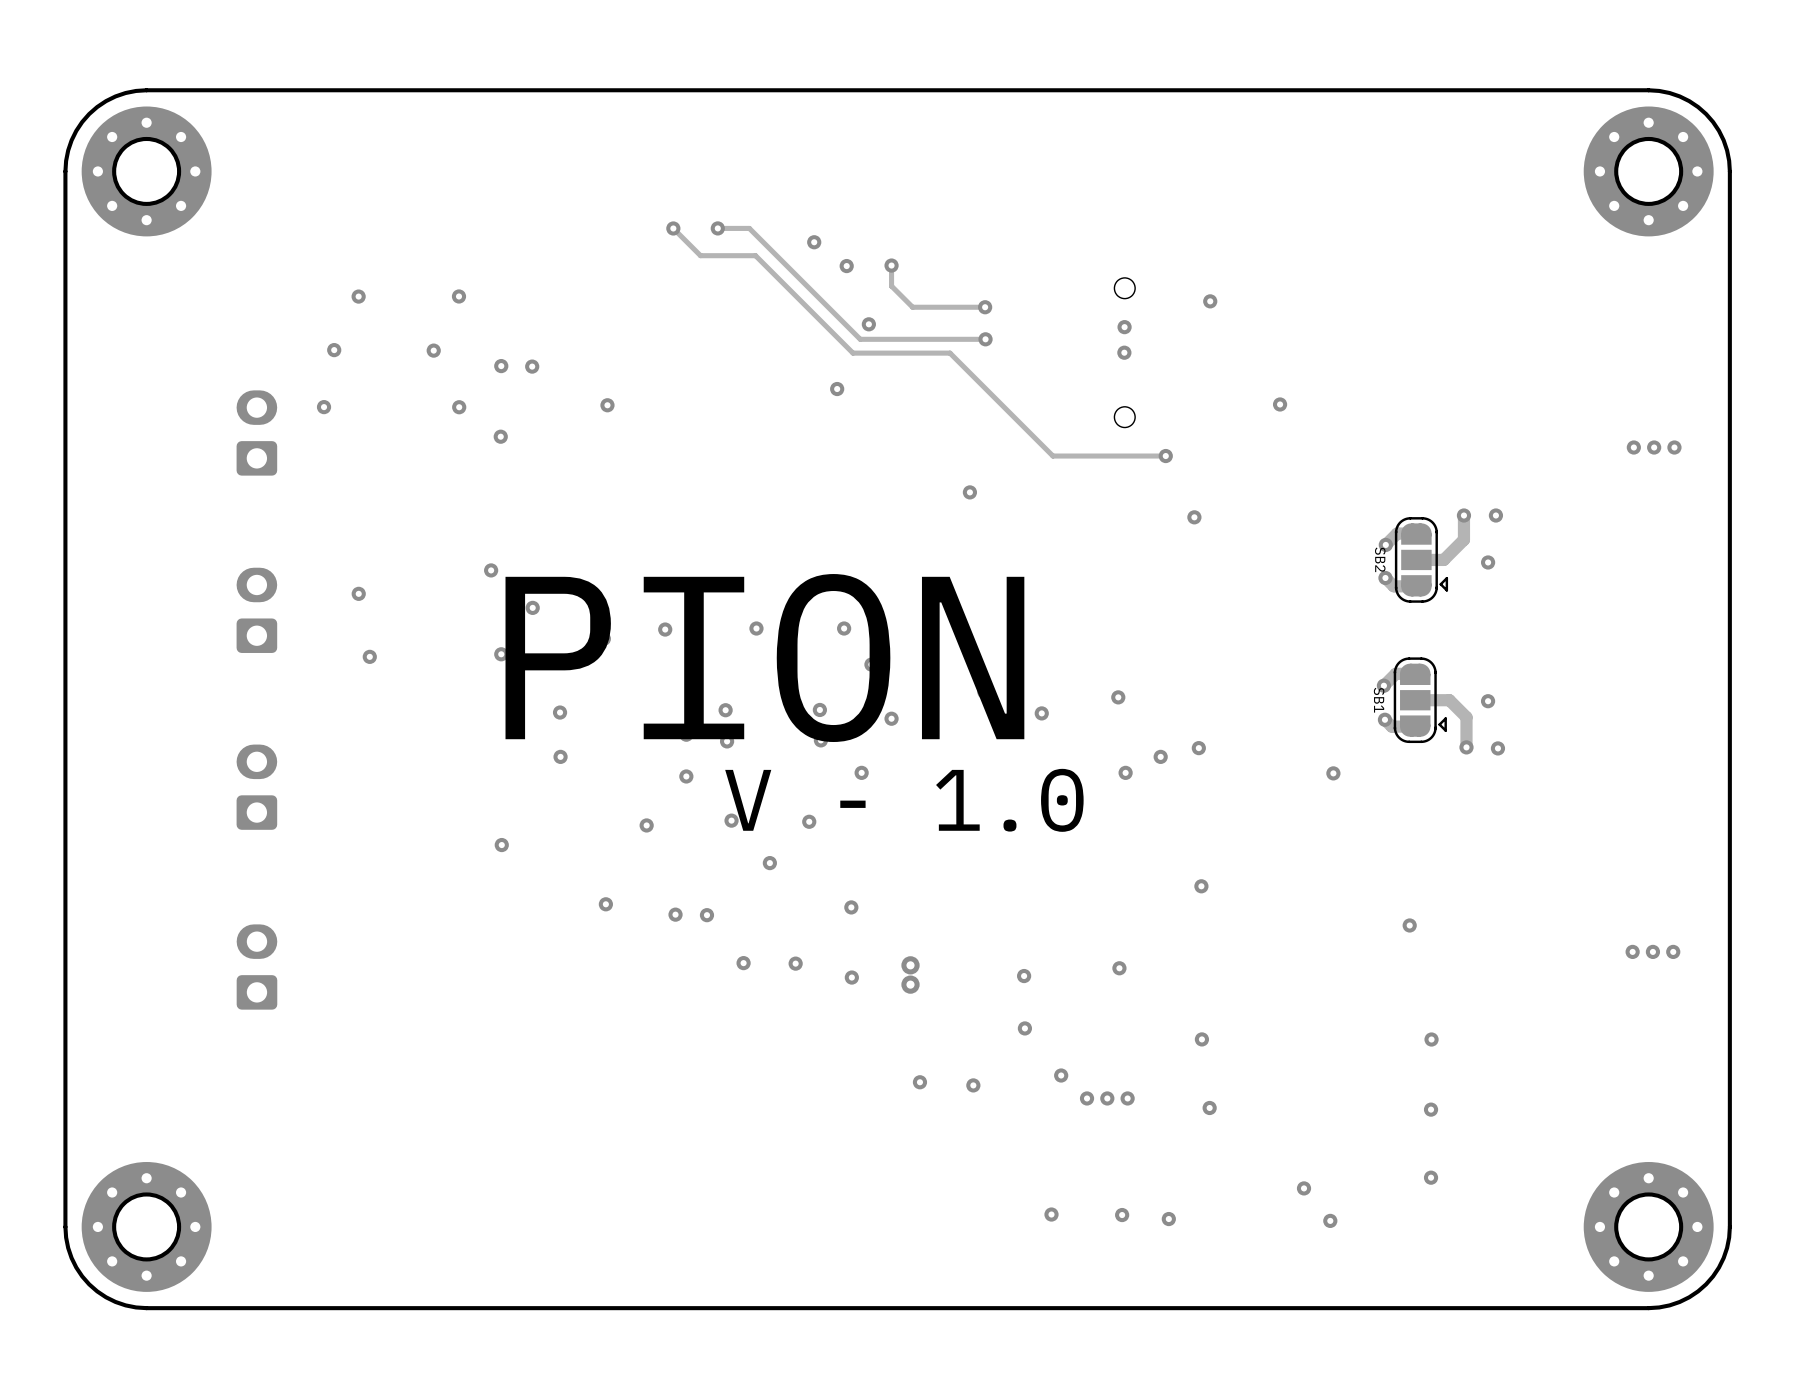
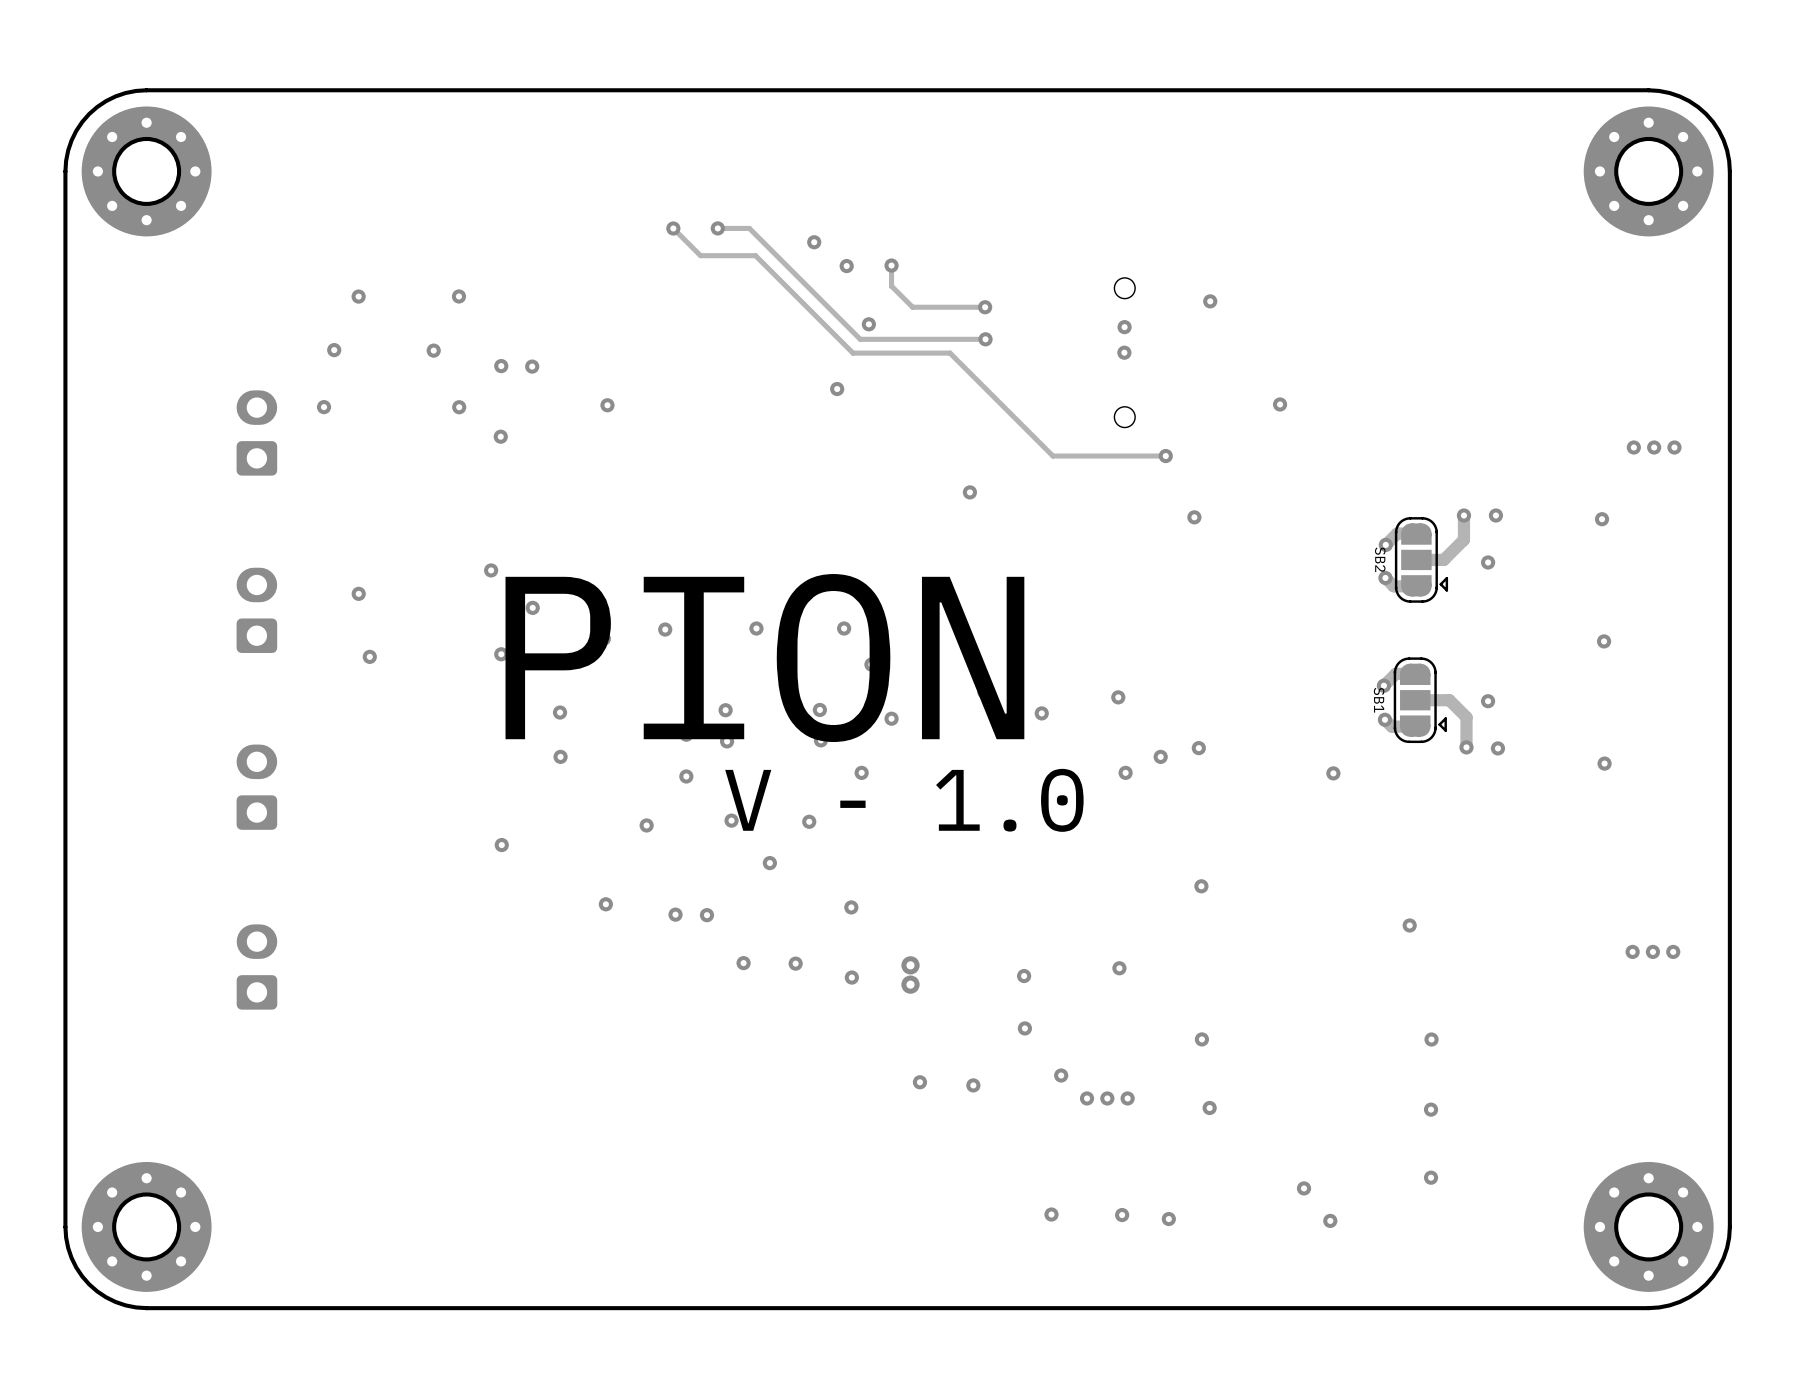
via: none -> (1602, 519)
via: none -> (1604, 641)
via: none -> (1604, 763)

